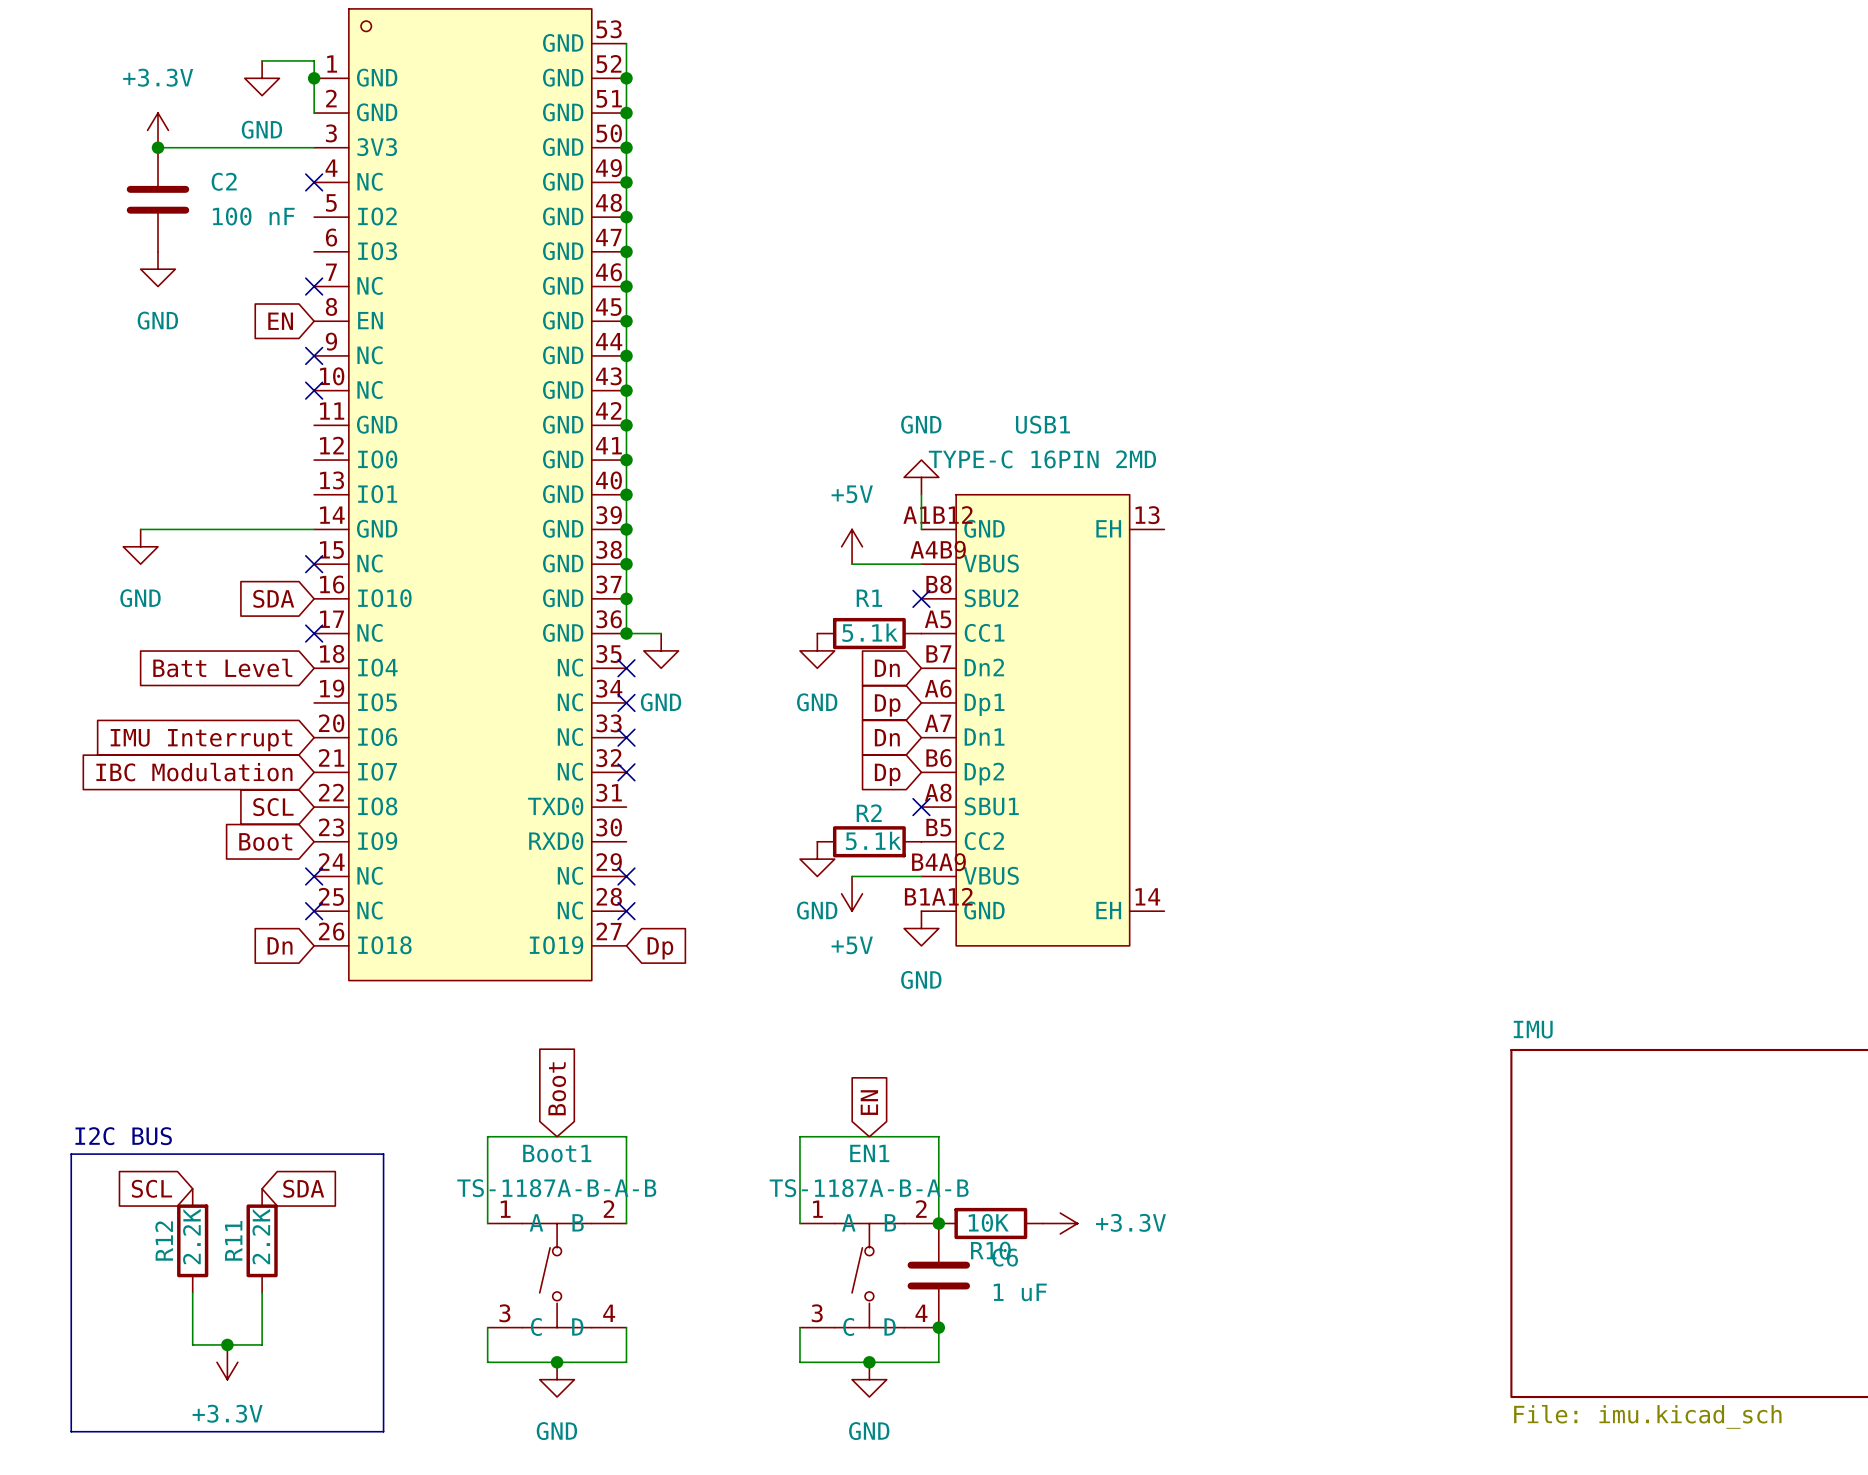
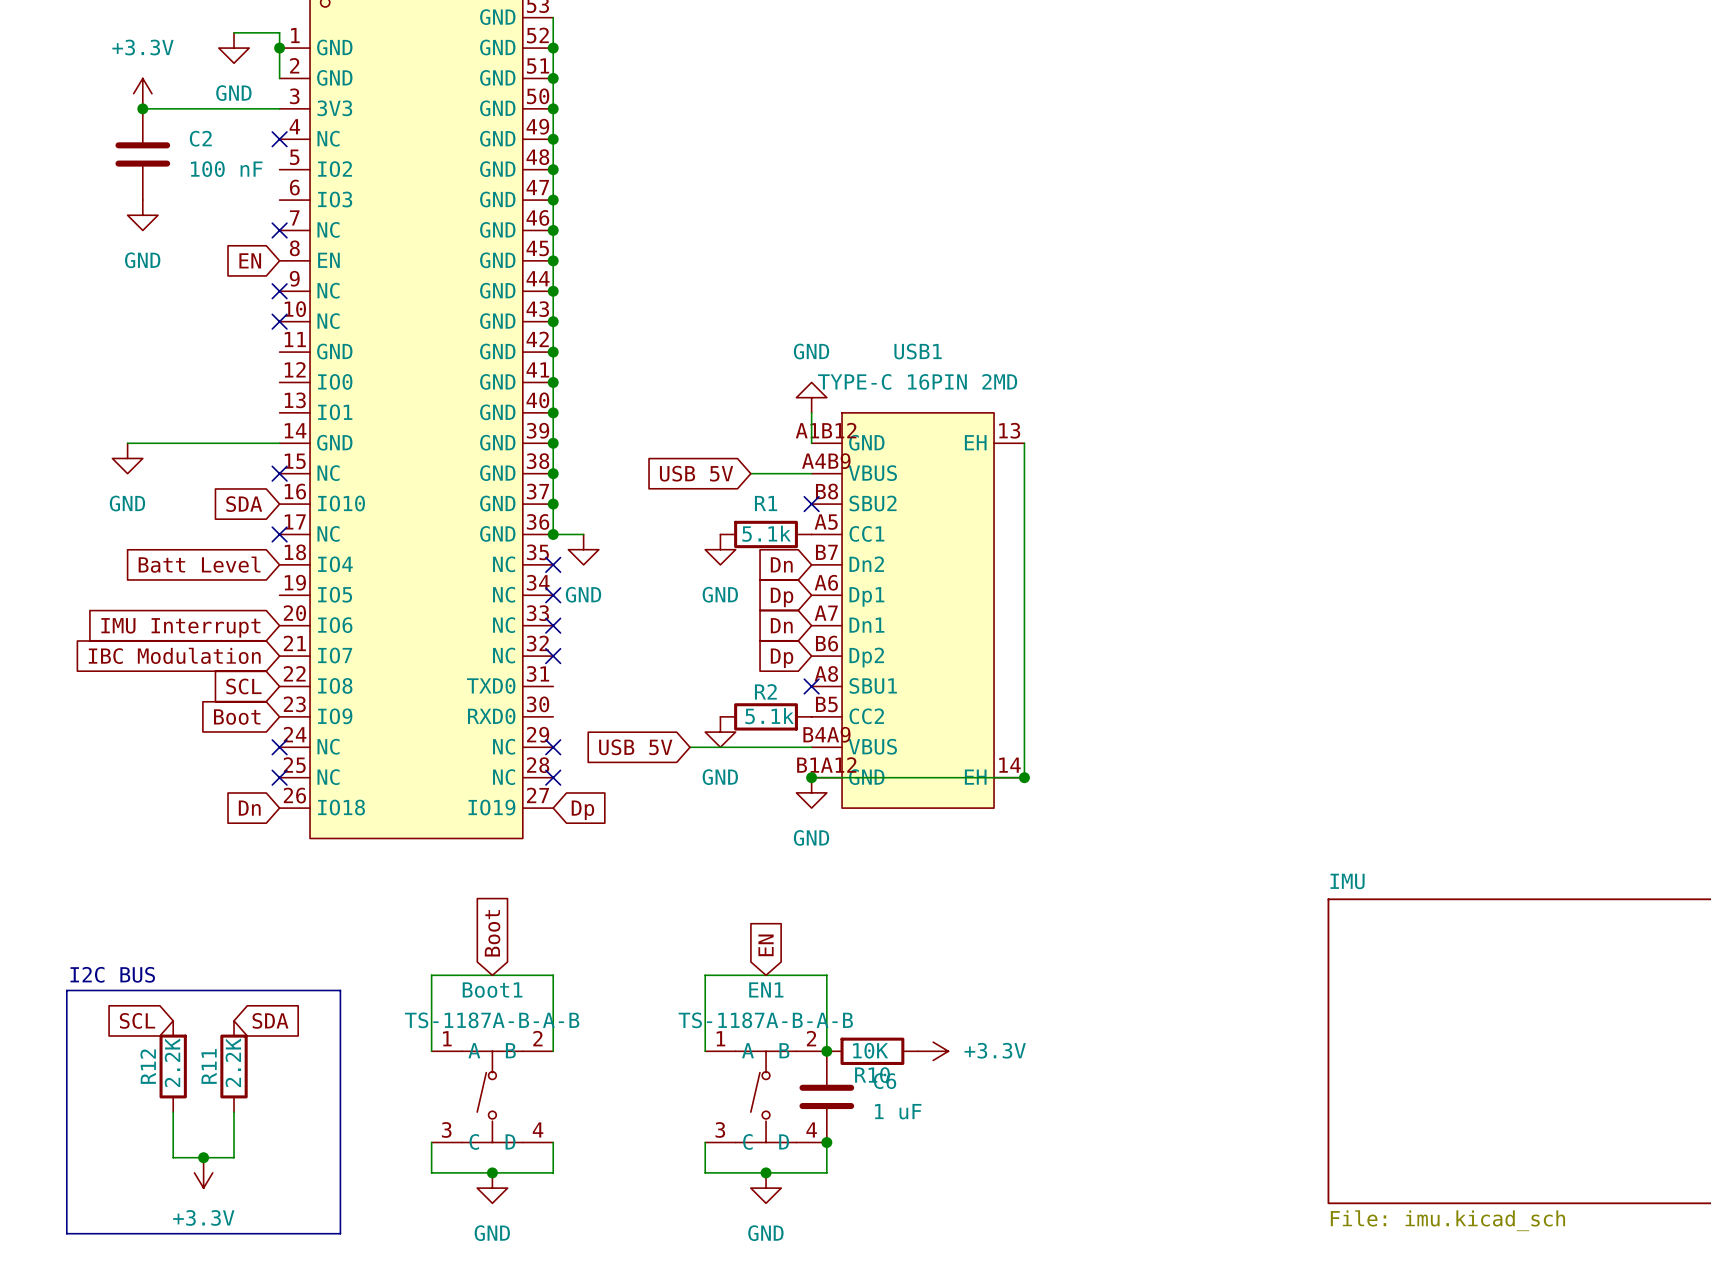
wire: none -> (1024, 443) (1024, 777) (811, 777)
power symbol: +5V (852, 546) -> none
global label: none -> USB 5V (696, 473)
global label: none -> USB 5V (635, 747)
wire: none -> (690, 747) (750, 747)
power symbol: +5V (852, 893) -> none
junction: none -> (811, 777)
junction: none -> (1024, 777)

